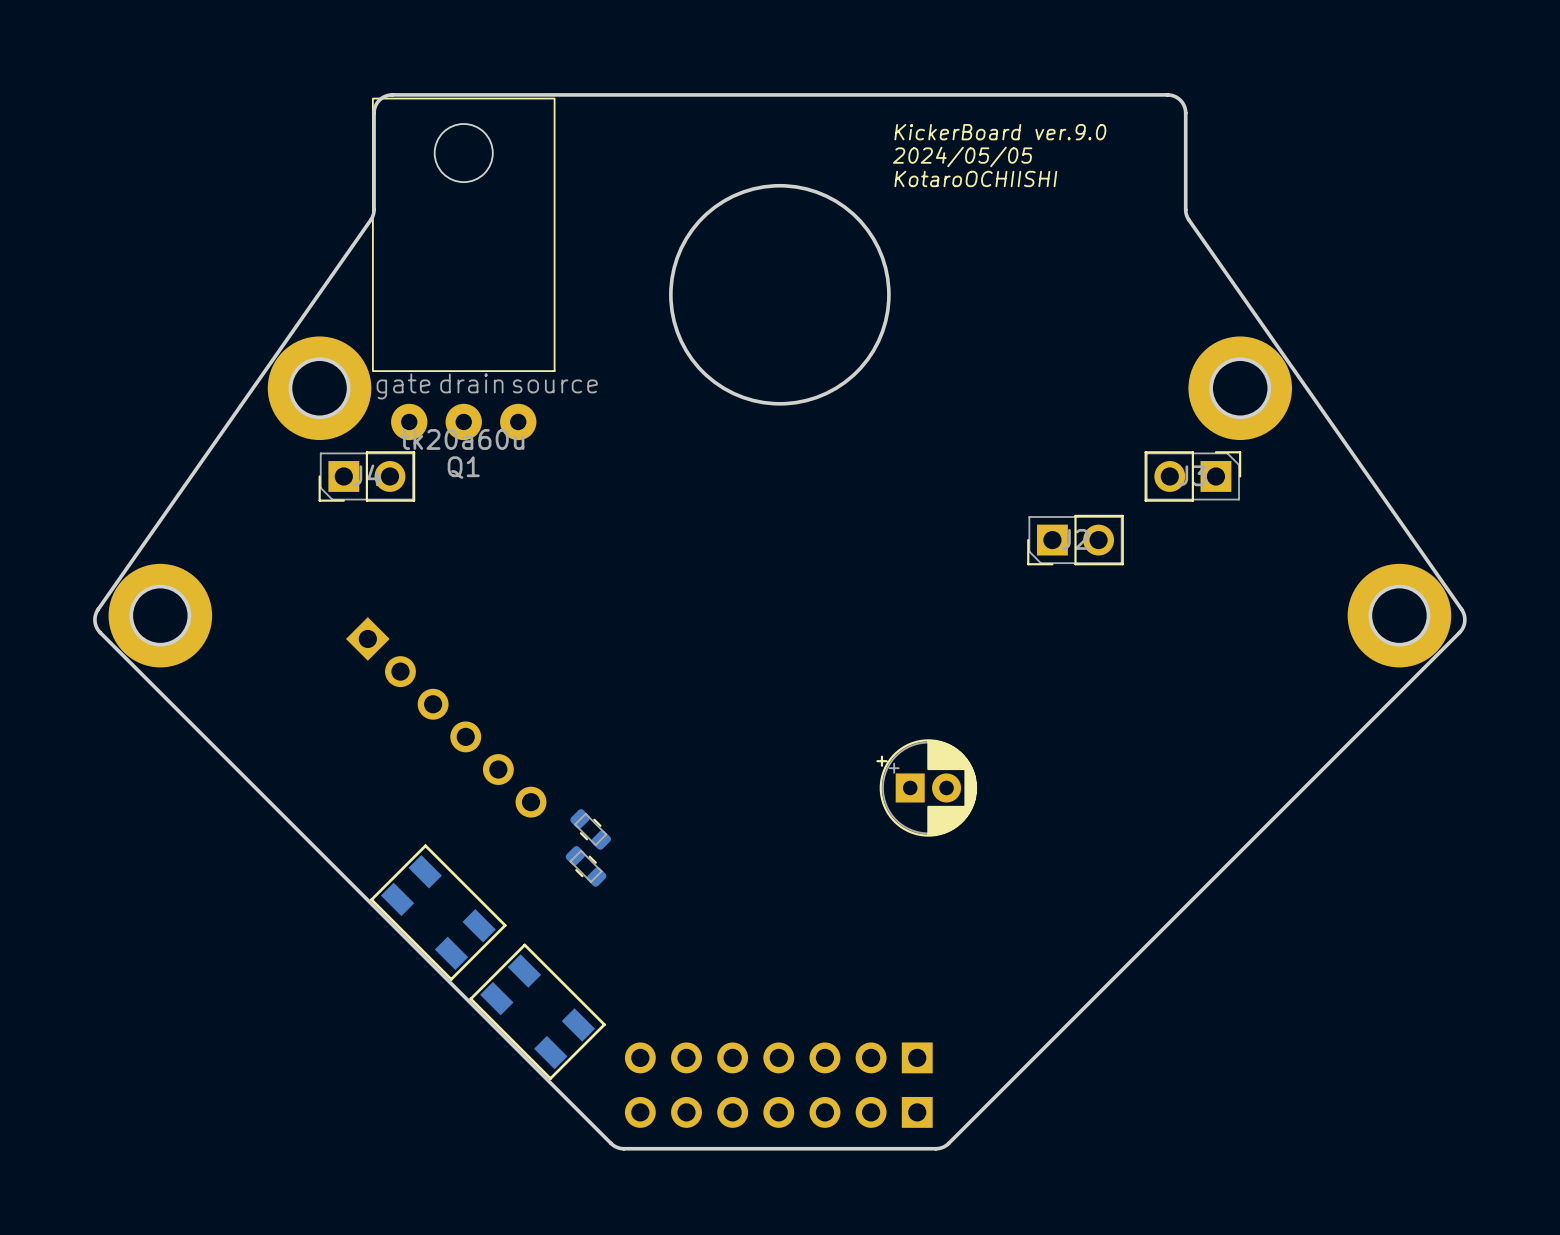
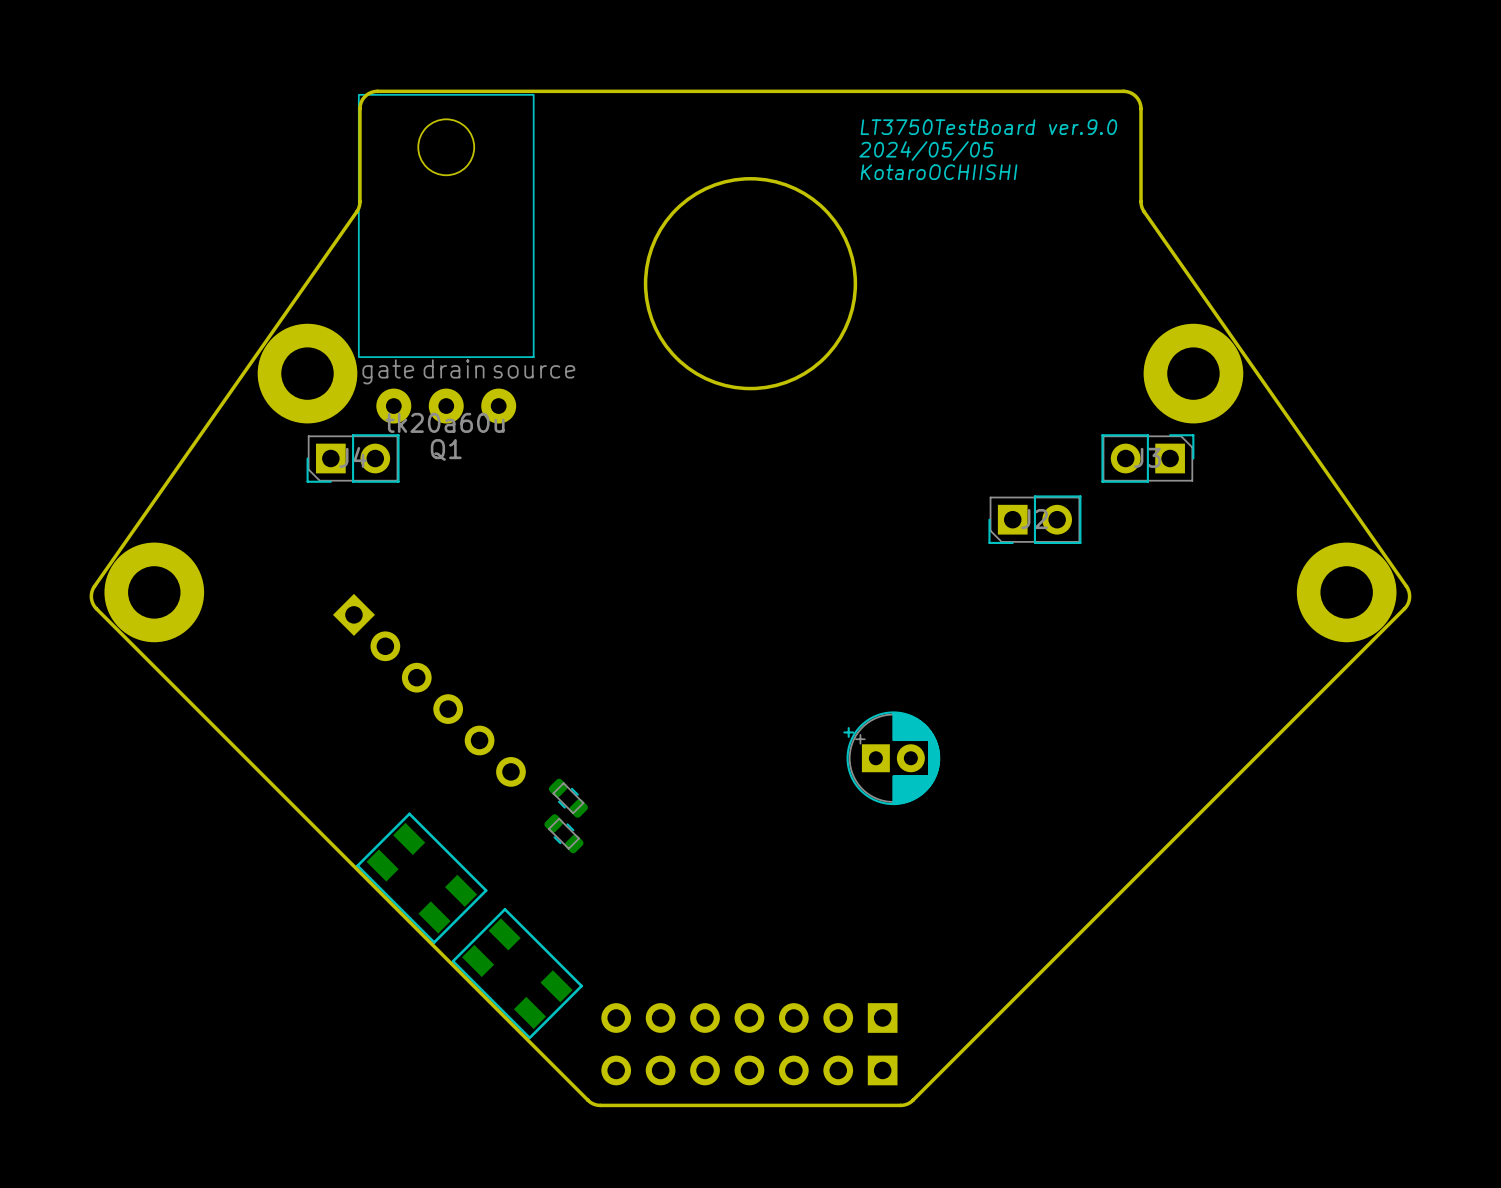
text: KickerBoard ver.9.0 (1000, 132) -> LT3750TestBoard ver.9.0 (988, 127)

